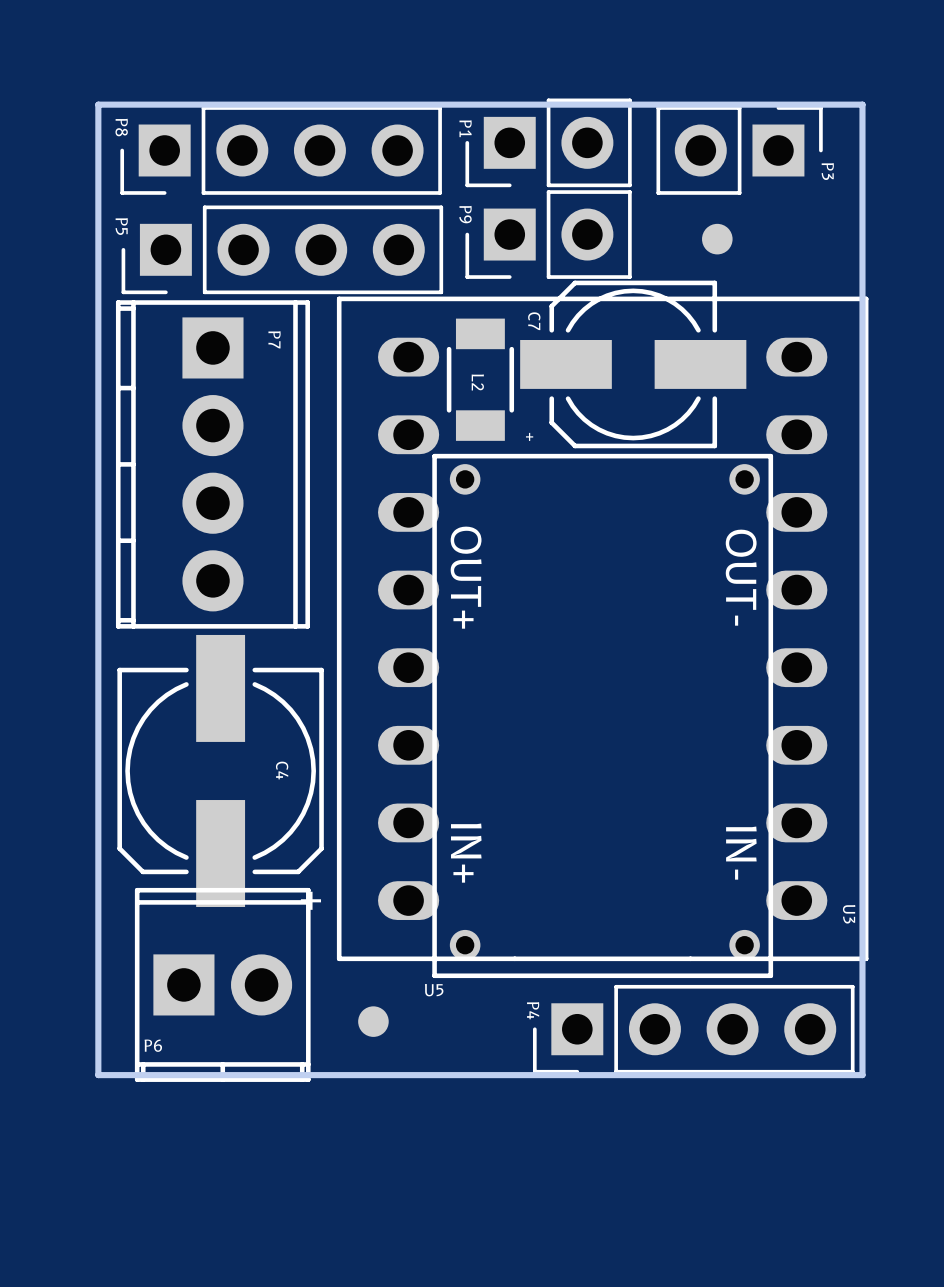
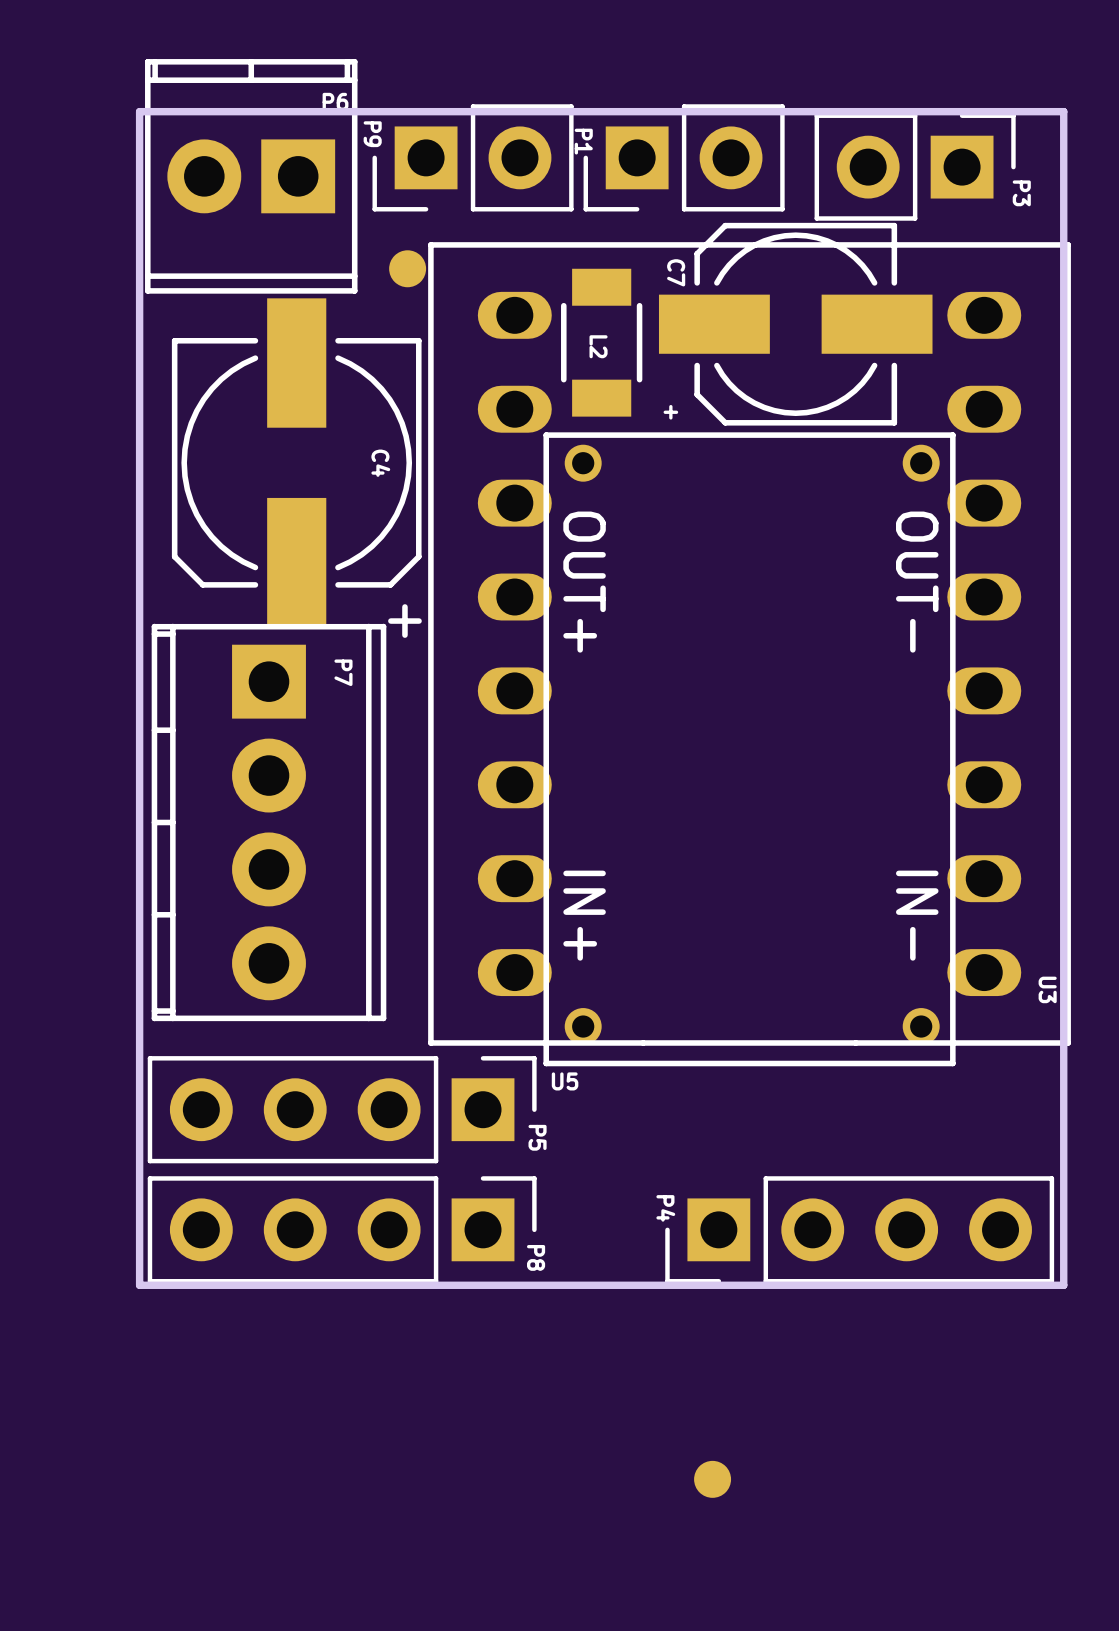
P8 rotation: 0° (281, 150) -> 180° (342, 1229)
P8 position: (281, 150) -> (342, 1229)
part: none -> (407, 268)
P9 position: (548, 234) -> (473, 157)
part: (717, 239) -> none
P5 rotation: 0° (282, 249) -> 180° (342, 1109)
P5 position: (282, 249) -> (342, 1109)
C7 position: (633, 364) -> (795, 324)
L2 position: (480, 379) -> (601, 342)
P7 position: (212, 464) -> (268, 822)
U3 position: (602, 628) -> (749, 643)
U5 position: (602, 715) -> (749, 749)
C4 position: (220, 770) -> (296, 462)
C4 name position: C4 (282, 770) -> C4 (380, 463)
P6 rotation: 0° (222, 984) -> 180° (251, 176)
P6 position: (222, 984) -> (251, 176)
U5 name position: U5 (434, 990) -> U5 (565, 1081)
part position: (373, 1021) -> (712, 1479)

